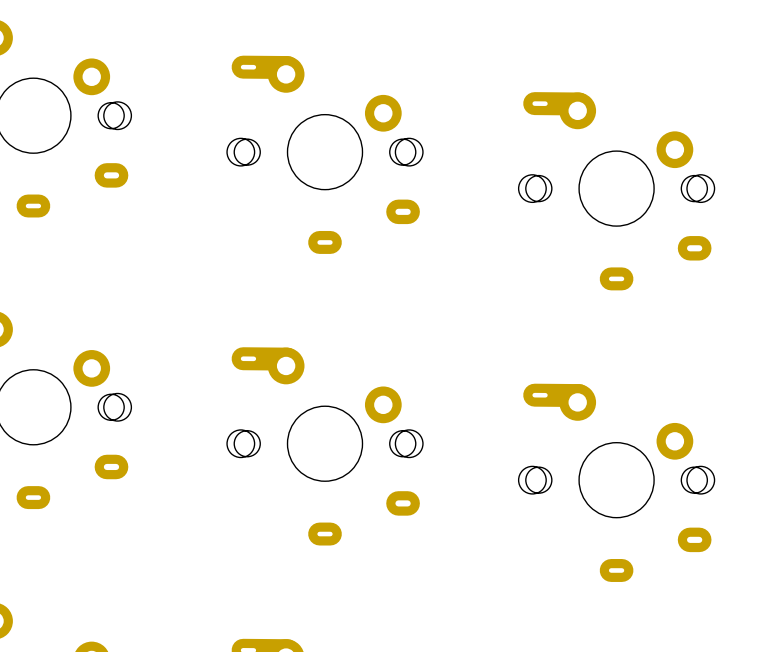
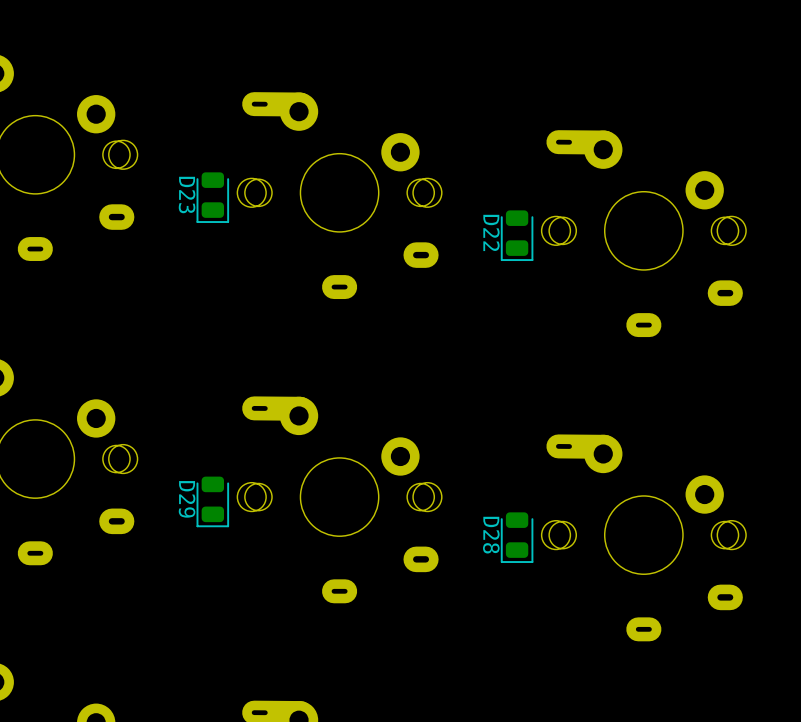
D23: none -> (212, 197)
D22: none -> (517, 235)
D29: none -> (212, 501)
D28: none -> (517, 537)

